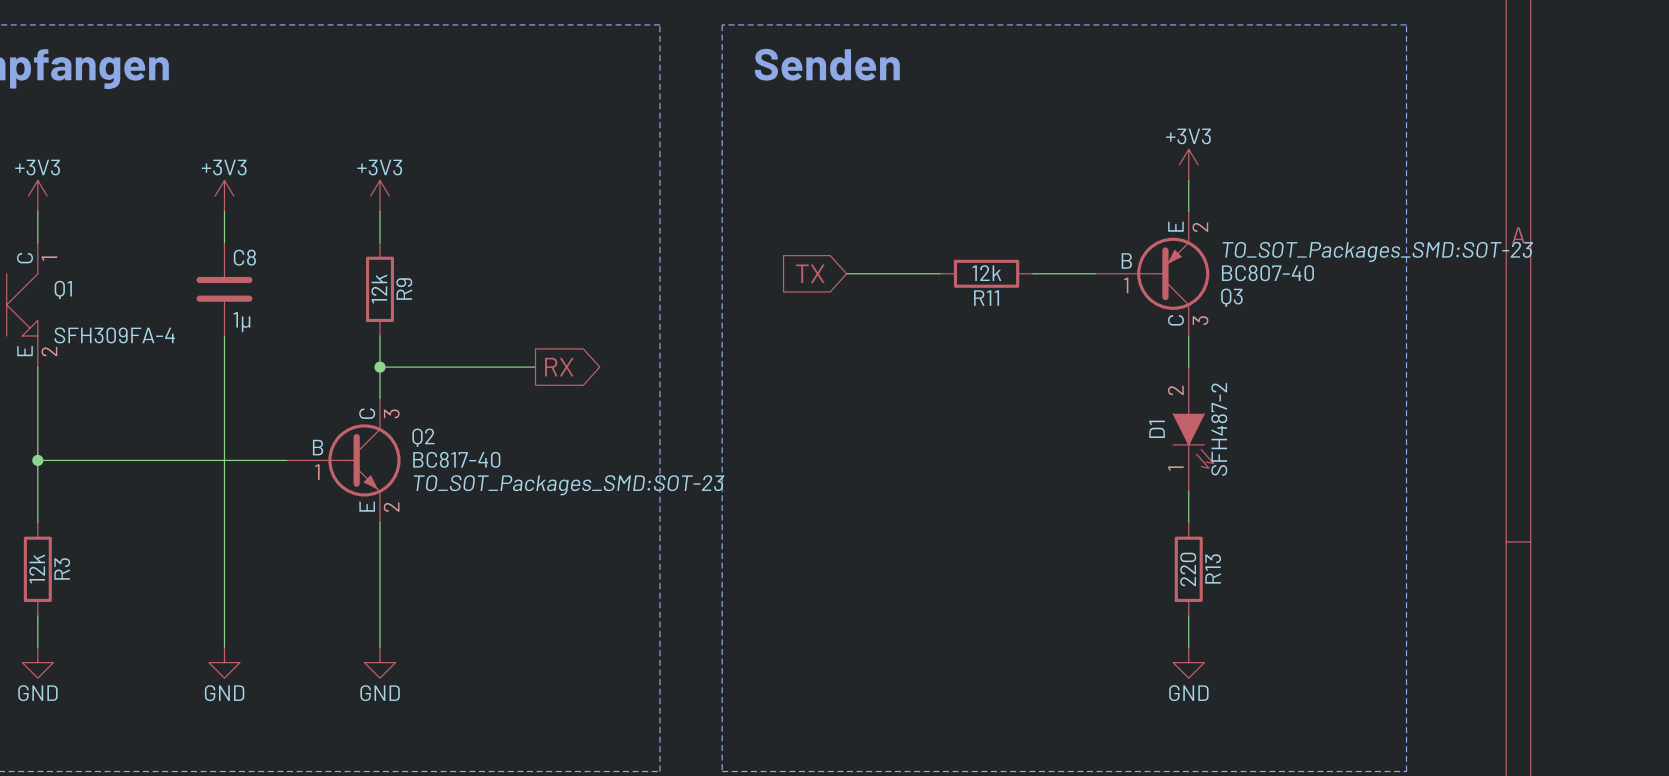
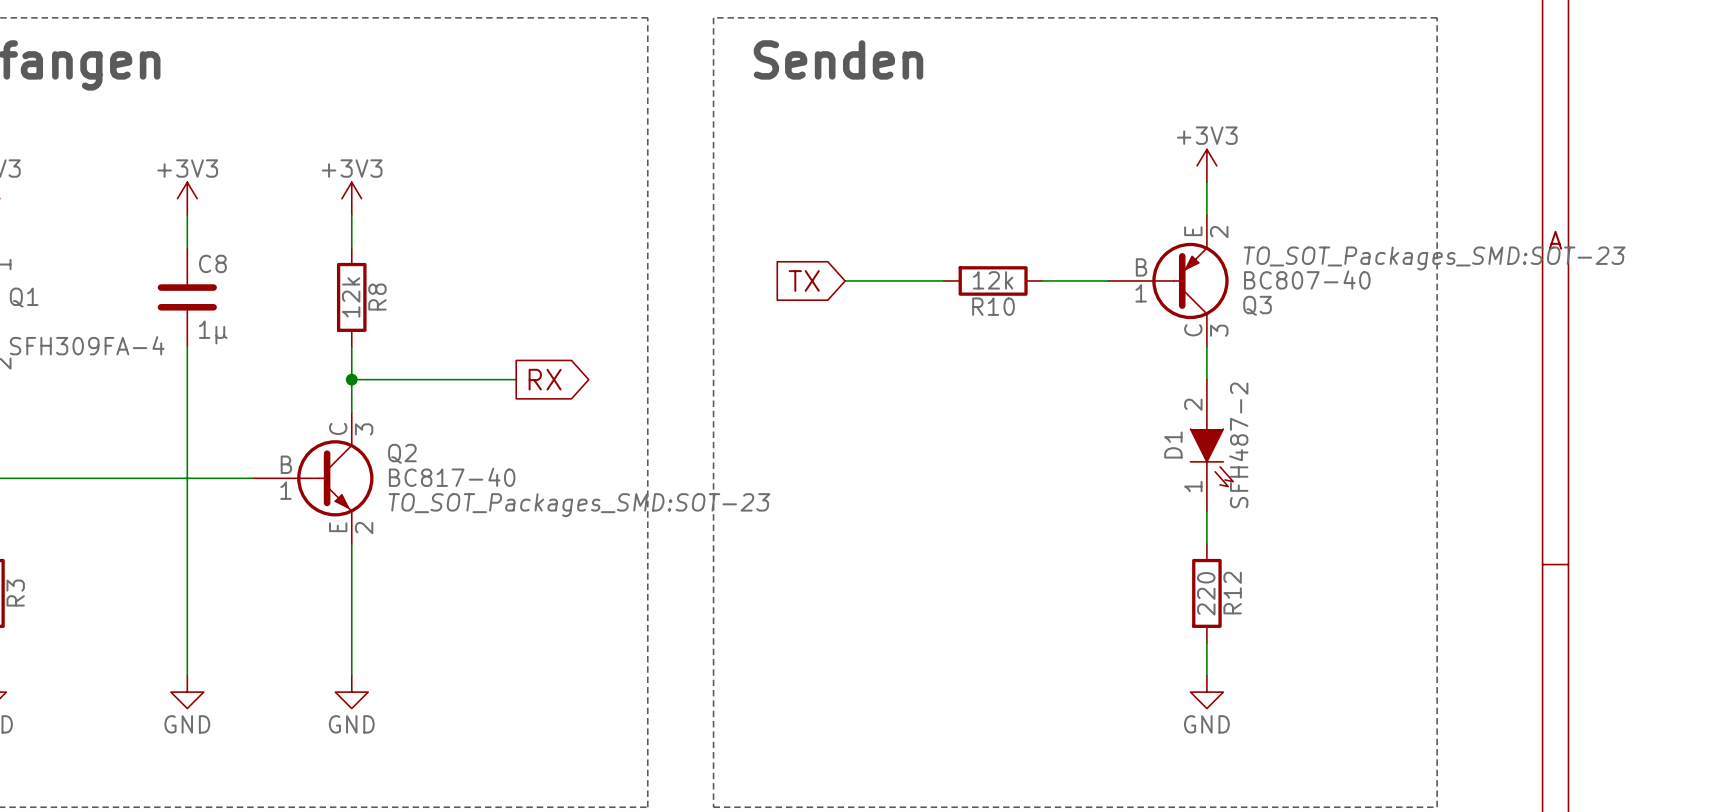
R9 name: R9 (404, 289) -> R8 (377, 297)
R11 name: R11 (986, 298) -> R10 (993, 306)
R13 name: R13 (1213, 568) -> R12 (1232, 593)

